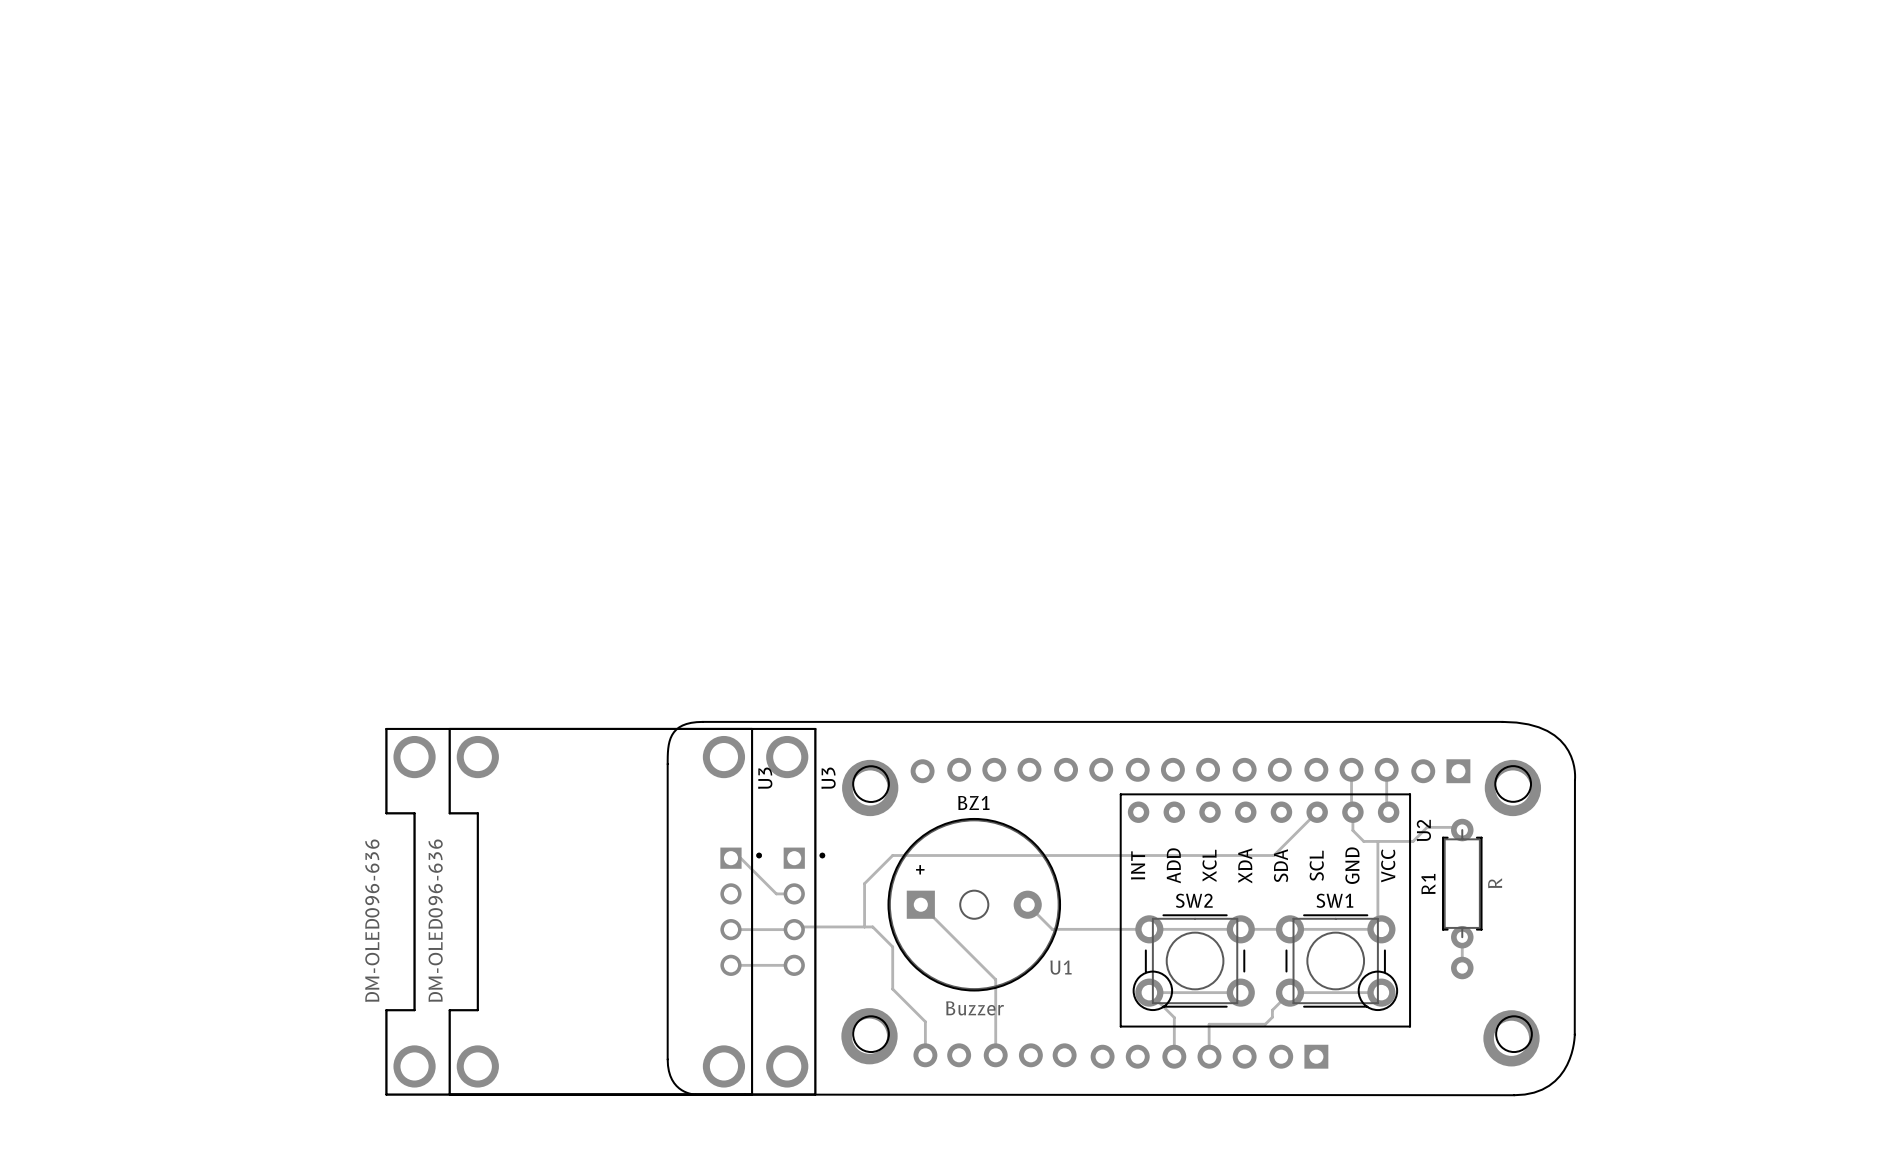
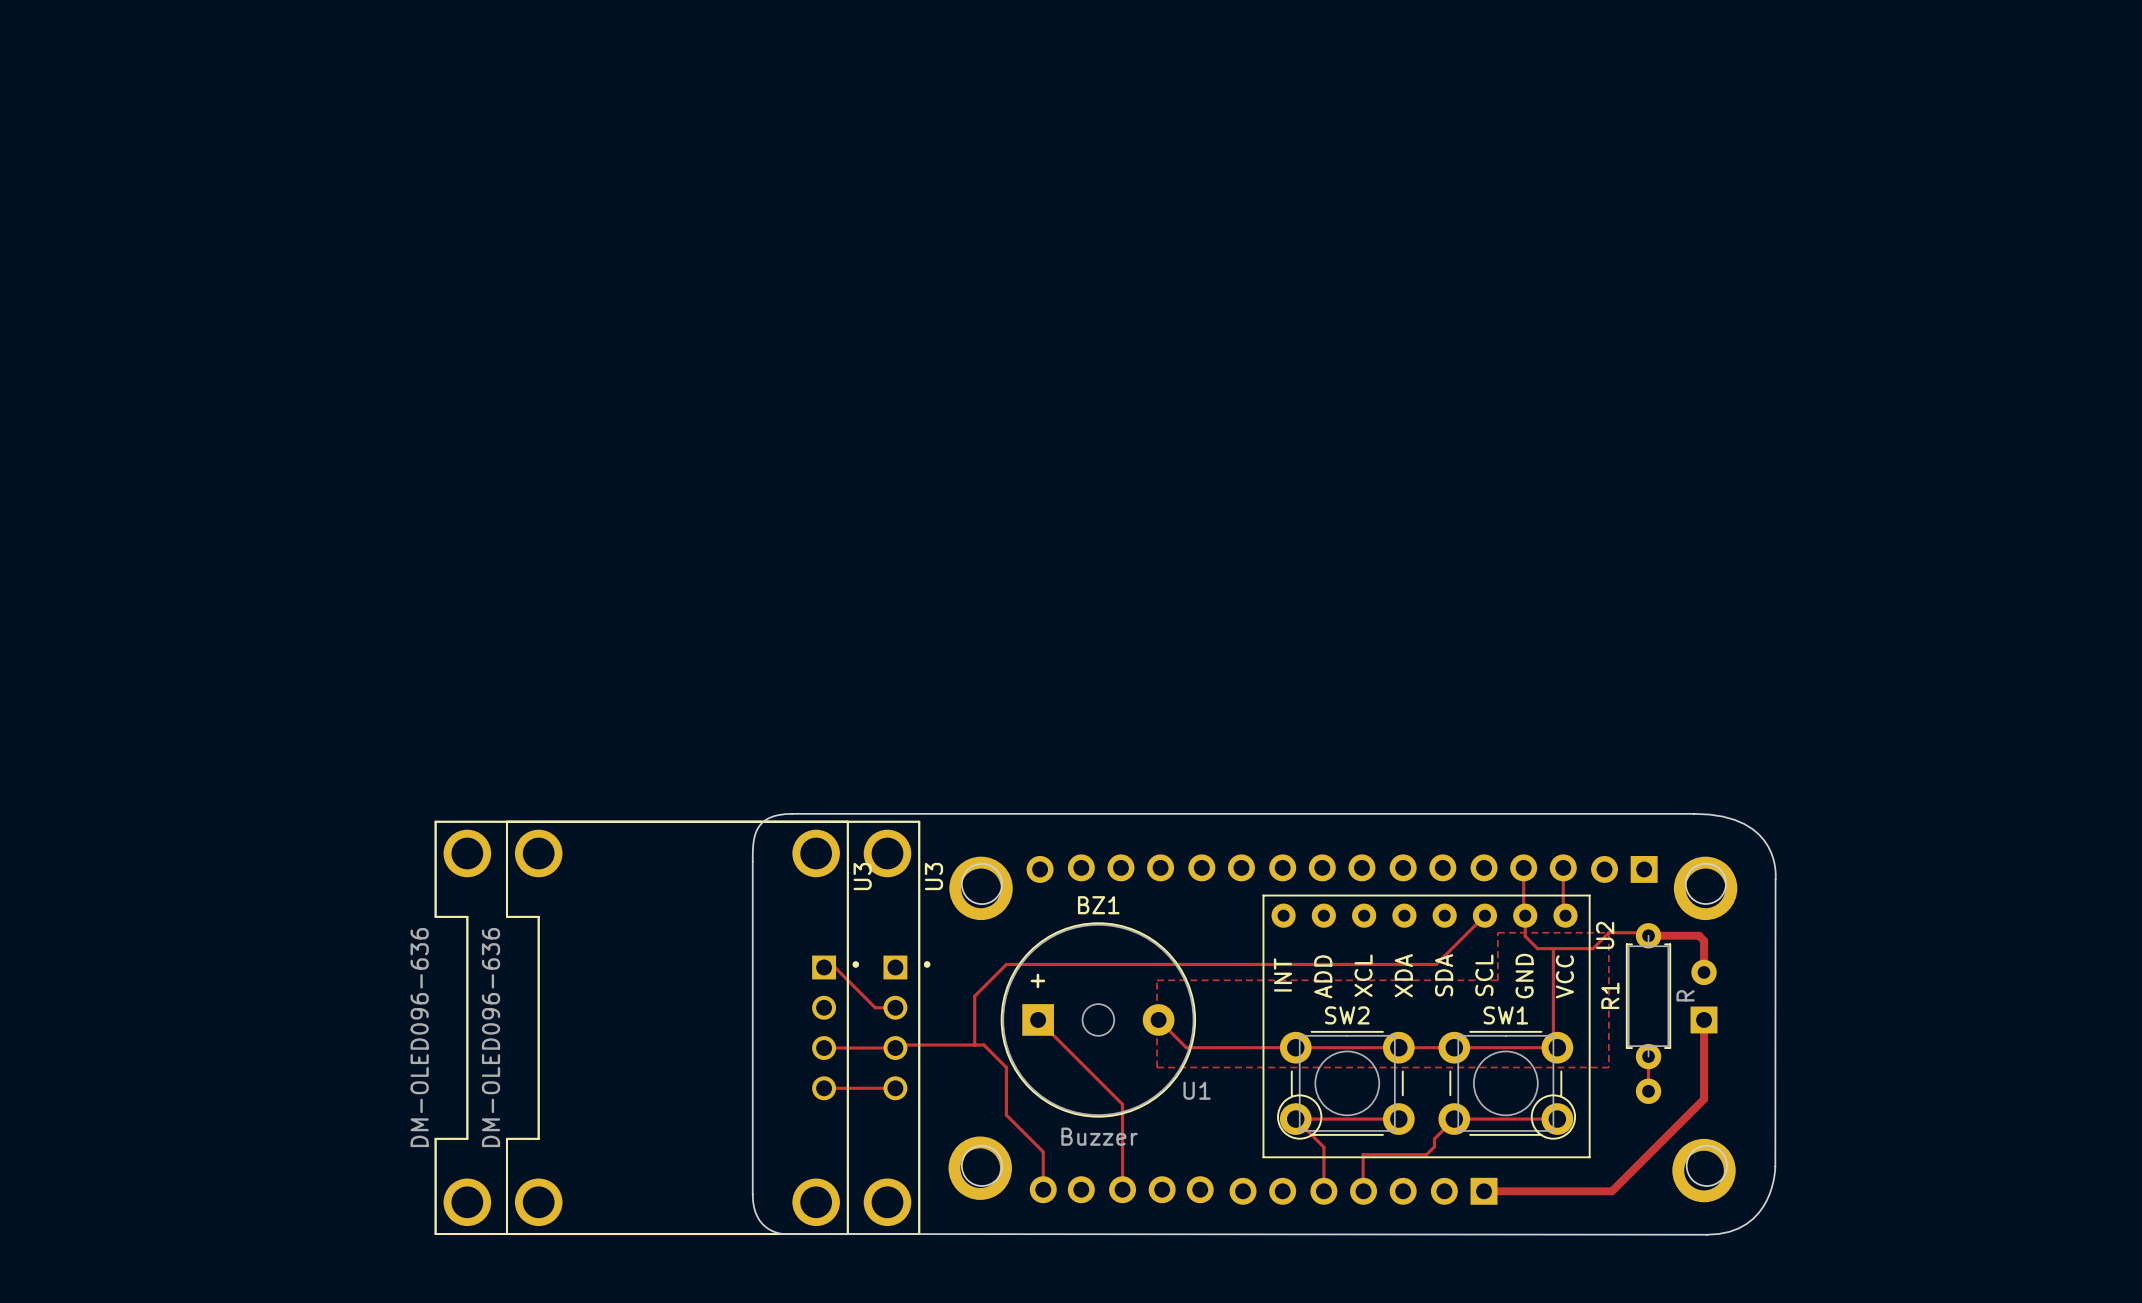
zone outline: none -> (1497, 932) (1497, 980) (1157, 980) (1157, 1067) (1608, 1067) (1608, 932) (1497, 932)
track: none -> (1648, 935) (1699, 935) (1704, 940) (1704, 972)
part: none -> (1704, 972)
track: none -> (1704, 1019) (1704, 1099) (1611, 1191) (1484, 1191)
part: none -> (1704, 1019)

